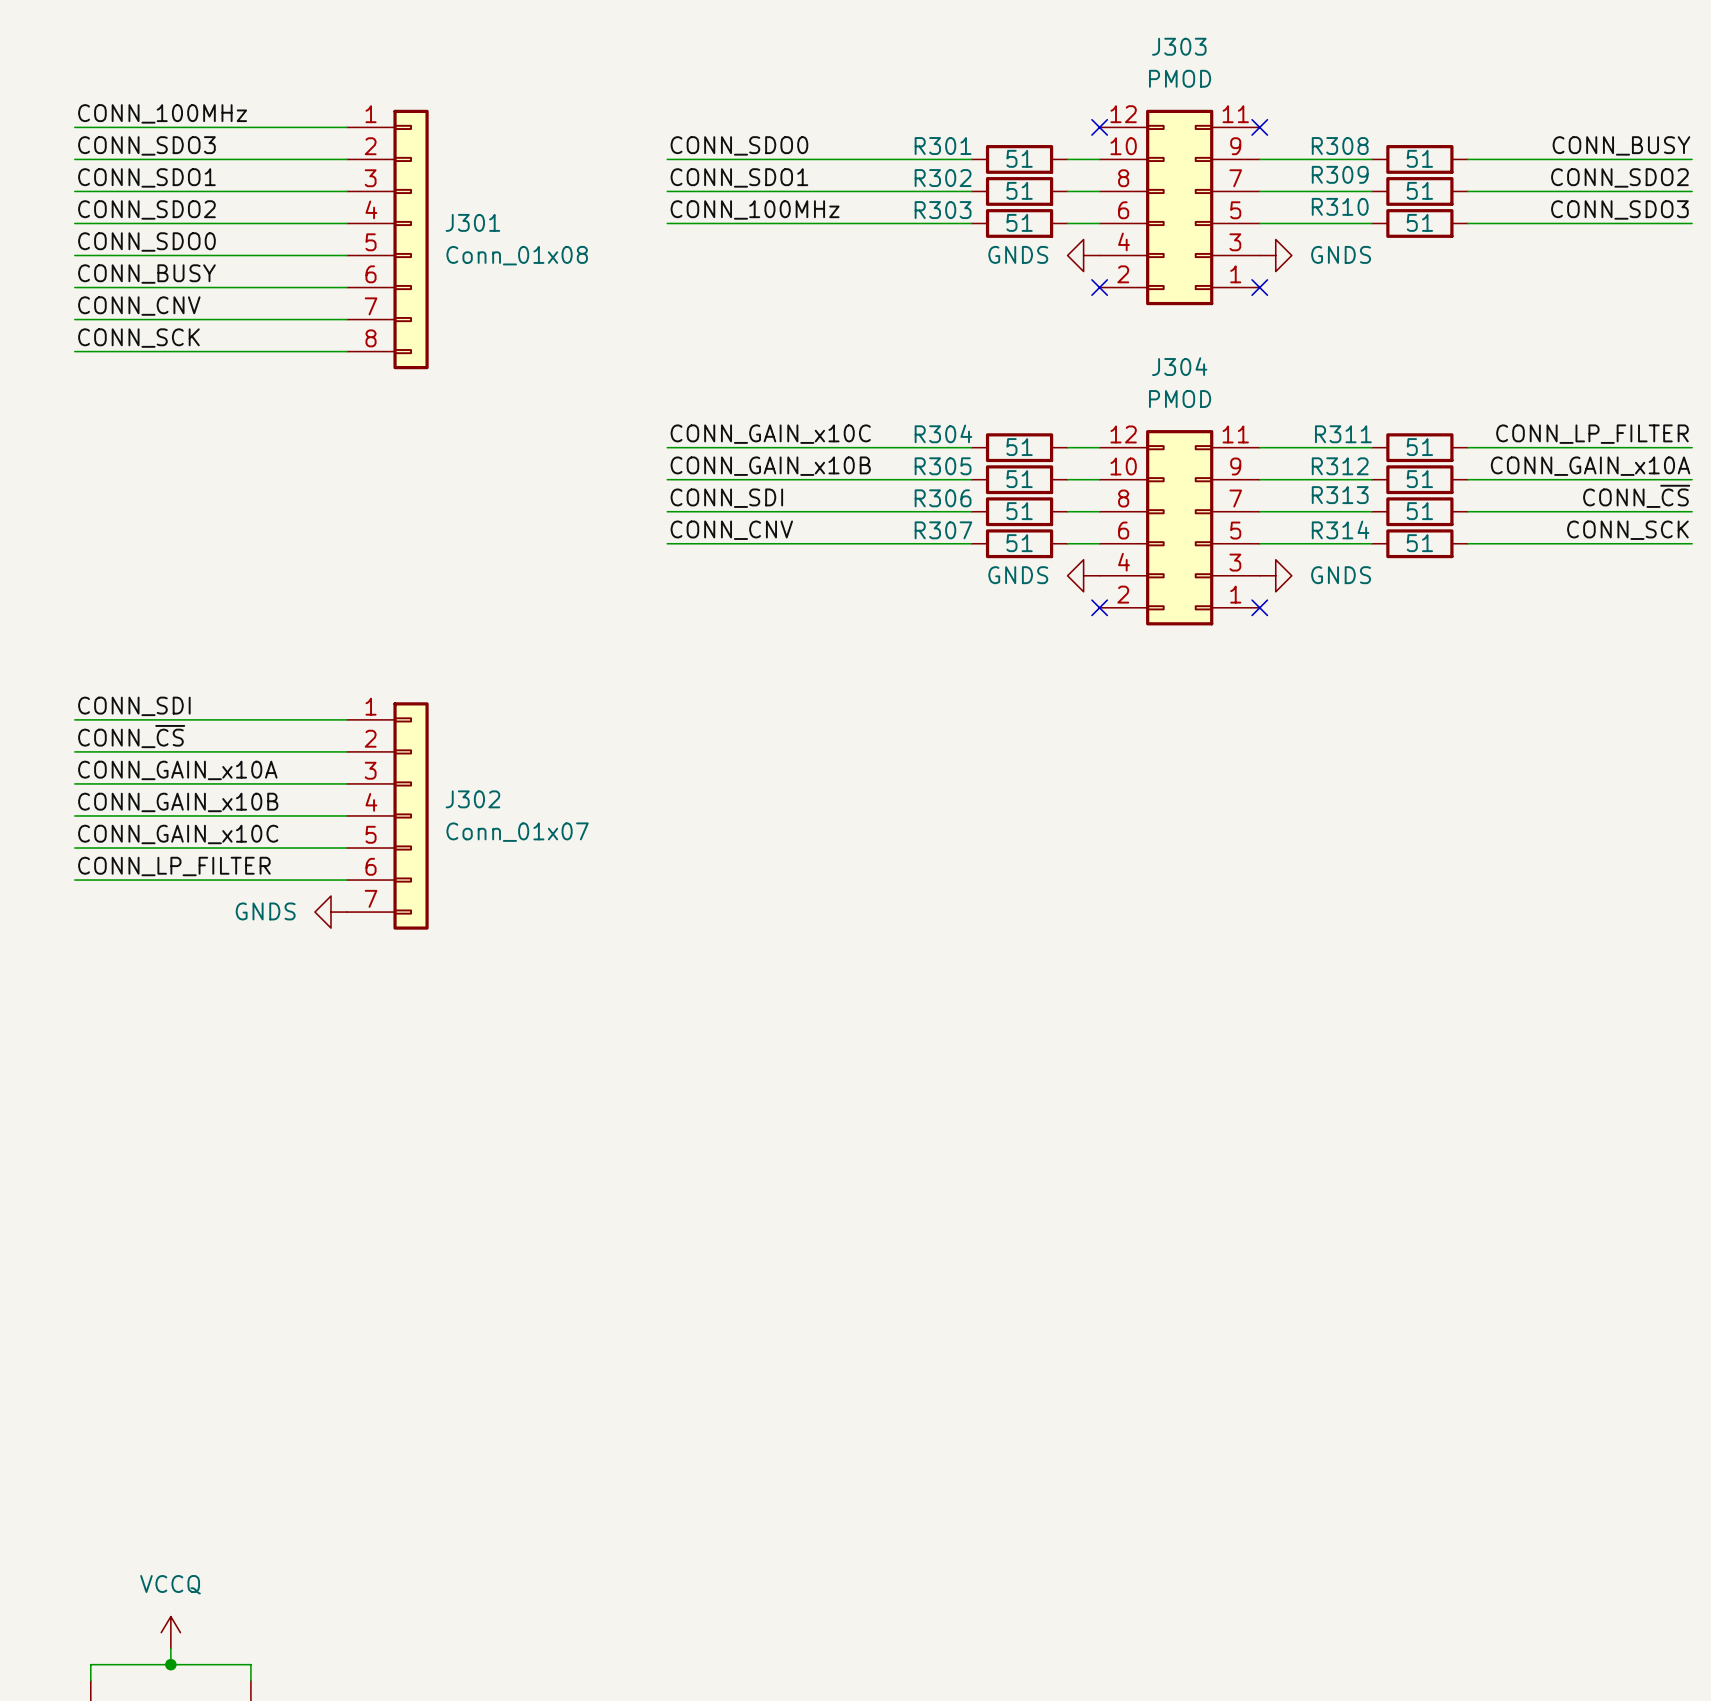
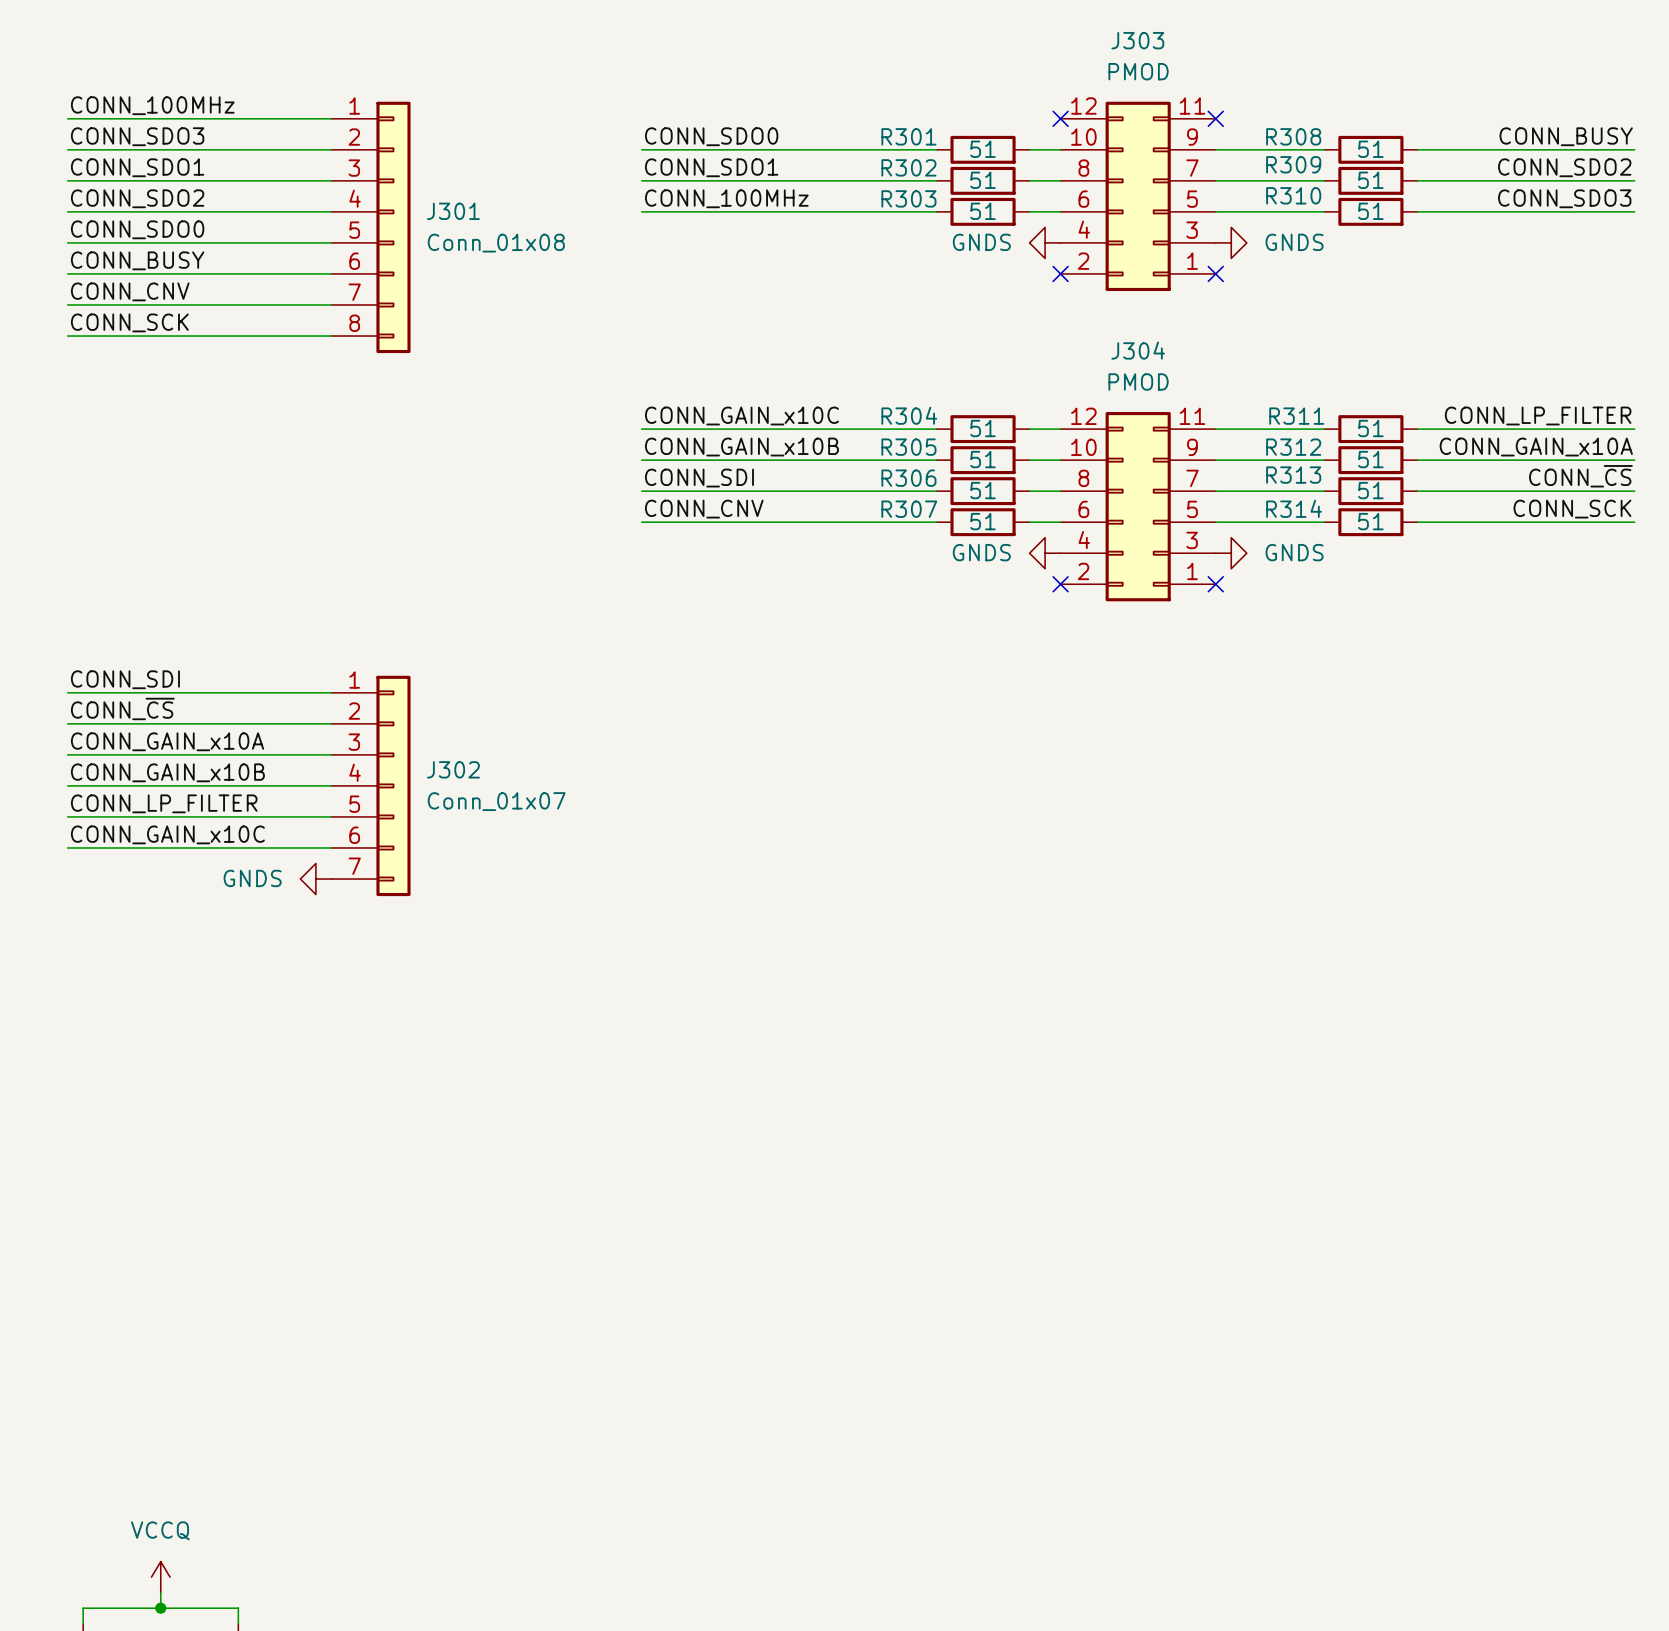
label: CONN_GAIN_x10C (178, 834) -> CONN_LP_FILTER (164, 803)
label: CONN_LP_FILTER (174, 866) -> CONN_GAIN_x10C (167, 834)

